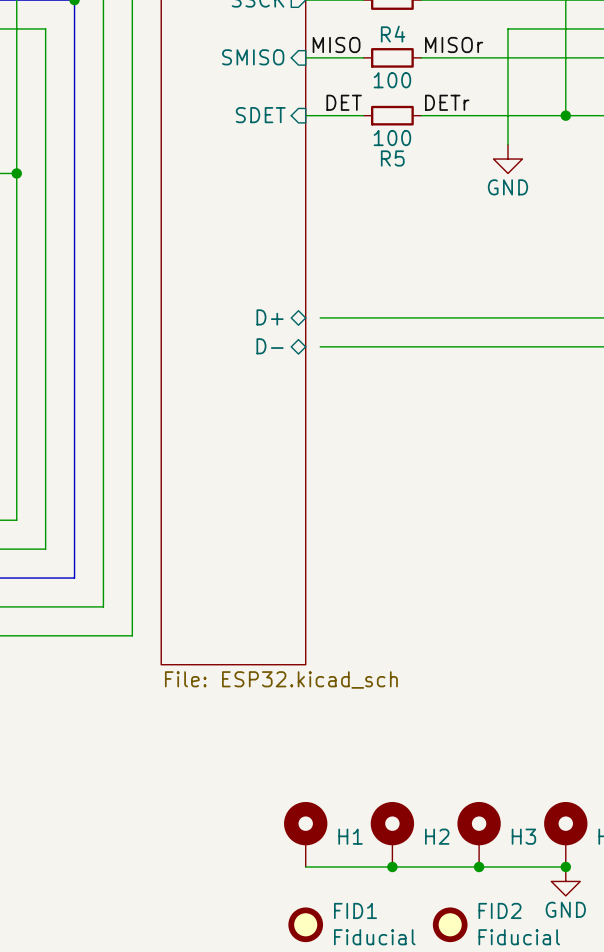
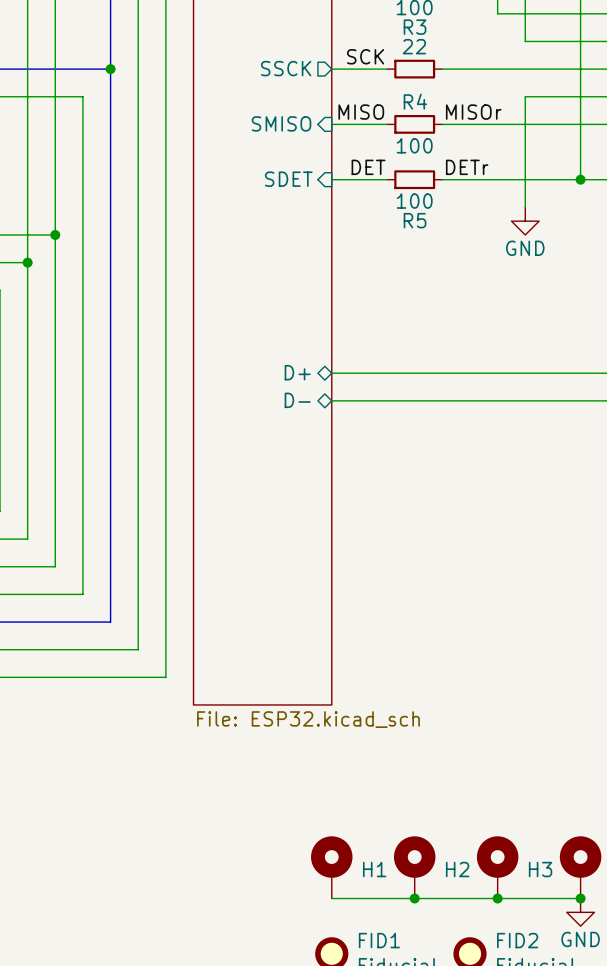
wire: none -> (331, 373) (345, 373)
wire: none -> (331, 400) (345, 400)

